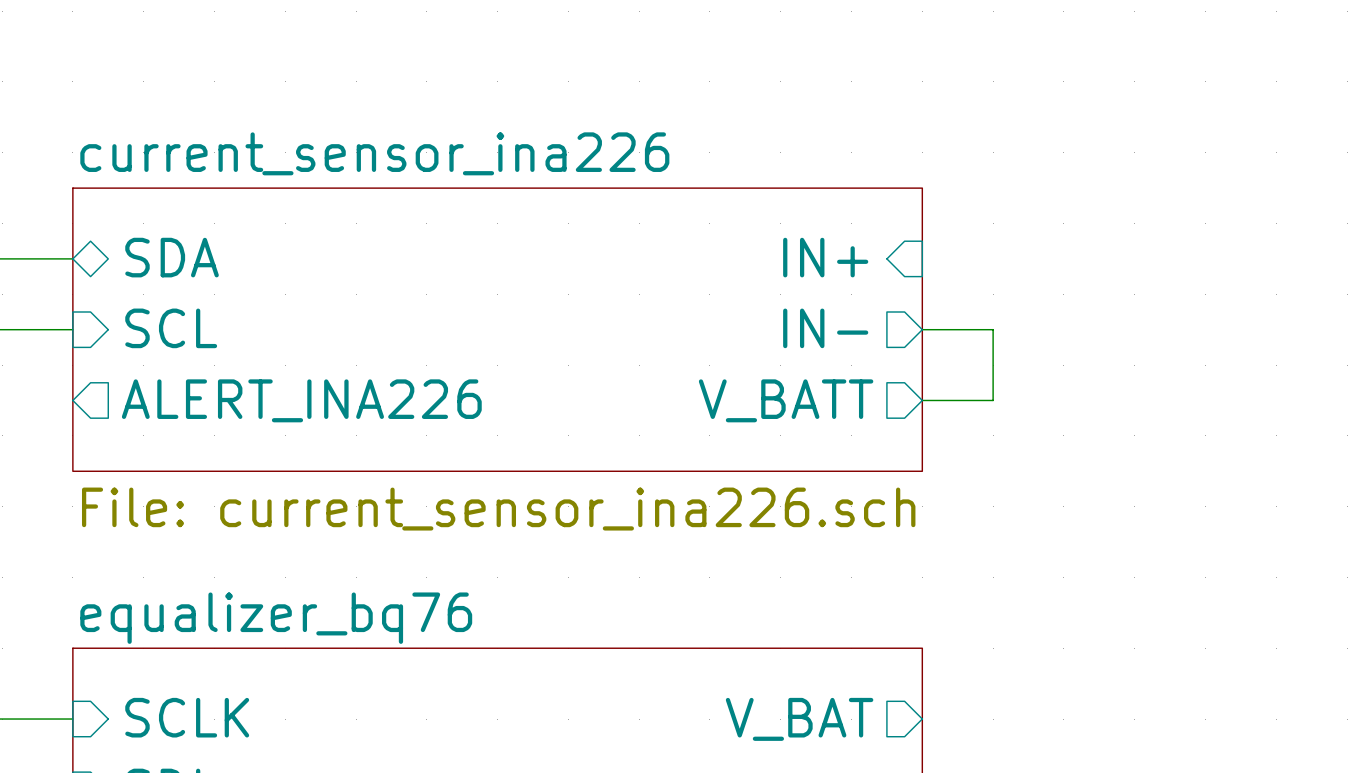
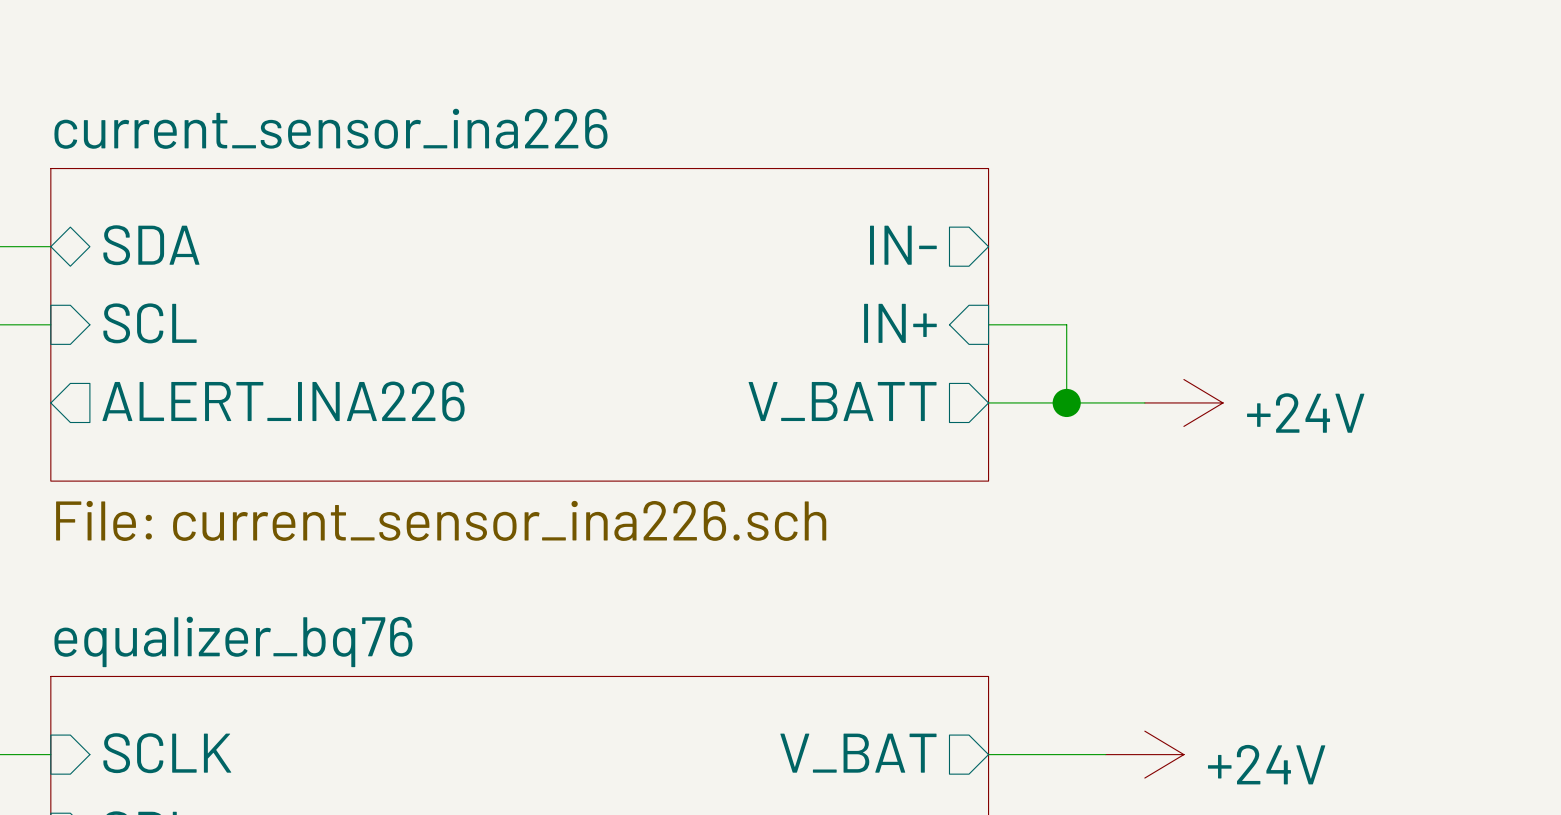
sheet pin shape: input (825, 257) -> output (903, 245)
sheet pin: IN+ (825, 257) -> IN- (903, 245)
sheet pin shape: output (825, 328) -> input (900, 323)
sheet pin: IN- (825, 328) -> IN+ (900, 323)
wire: none -> (1066, 402) (1144, 402)
junction: none -> (1066, 402)
power symbol: none -> +24V (1183, 402)
wire: none -> (988, 754) (1105, 754)
power symbol: none -> +24V (1144, 754)

